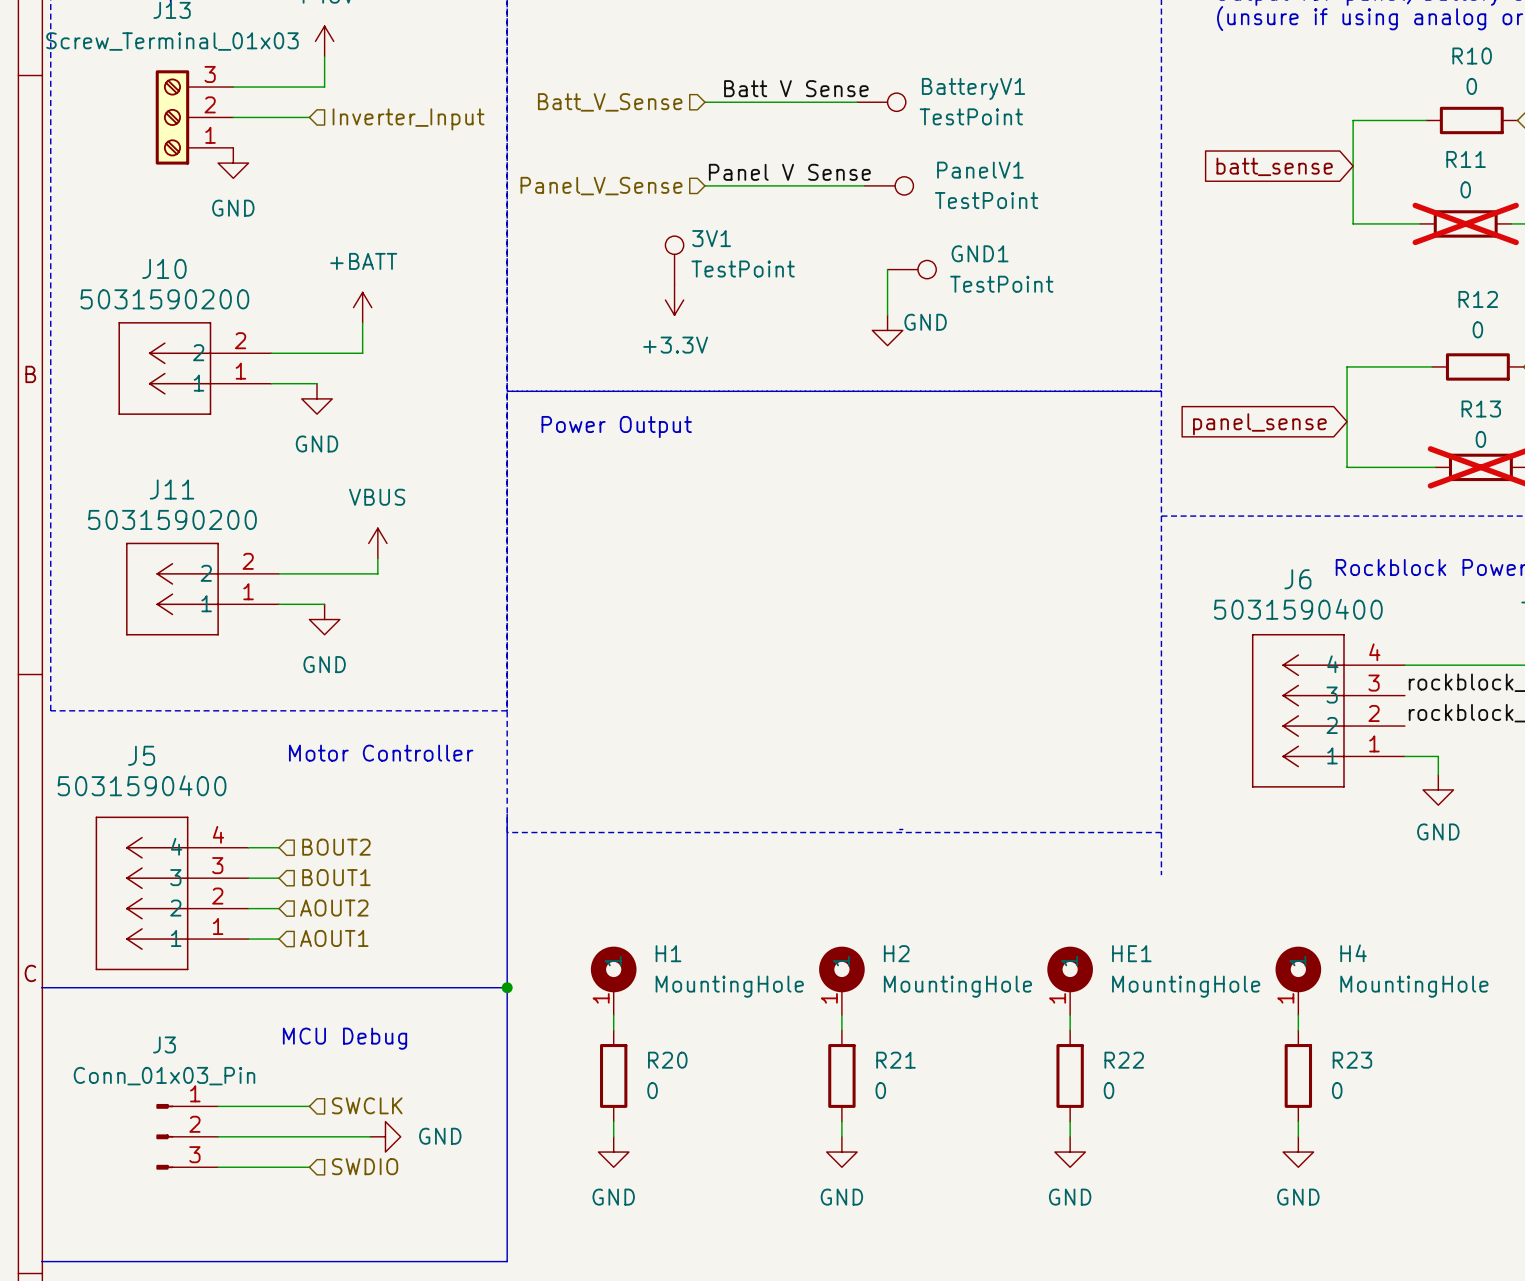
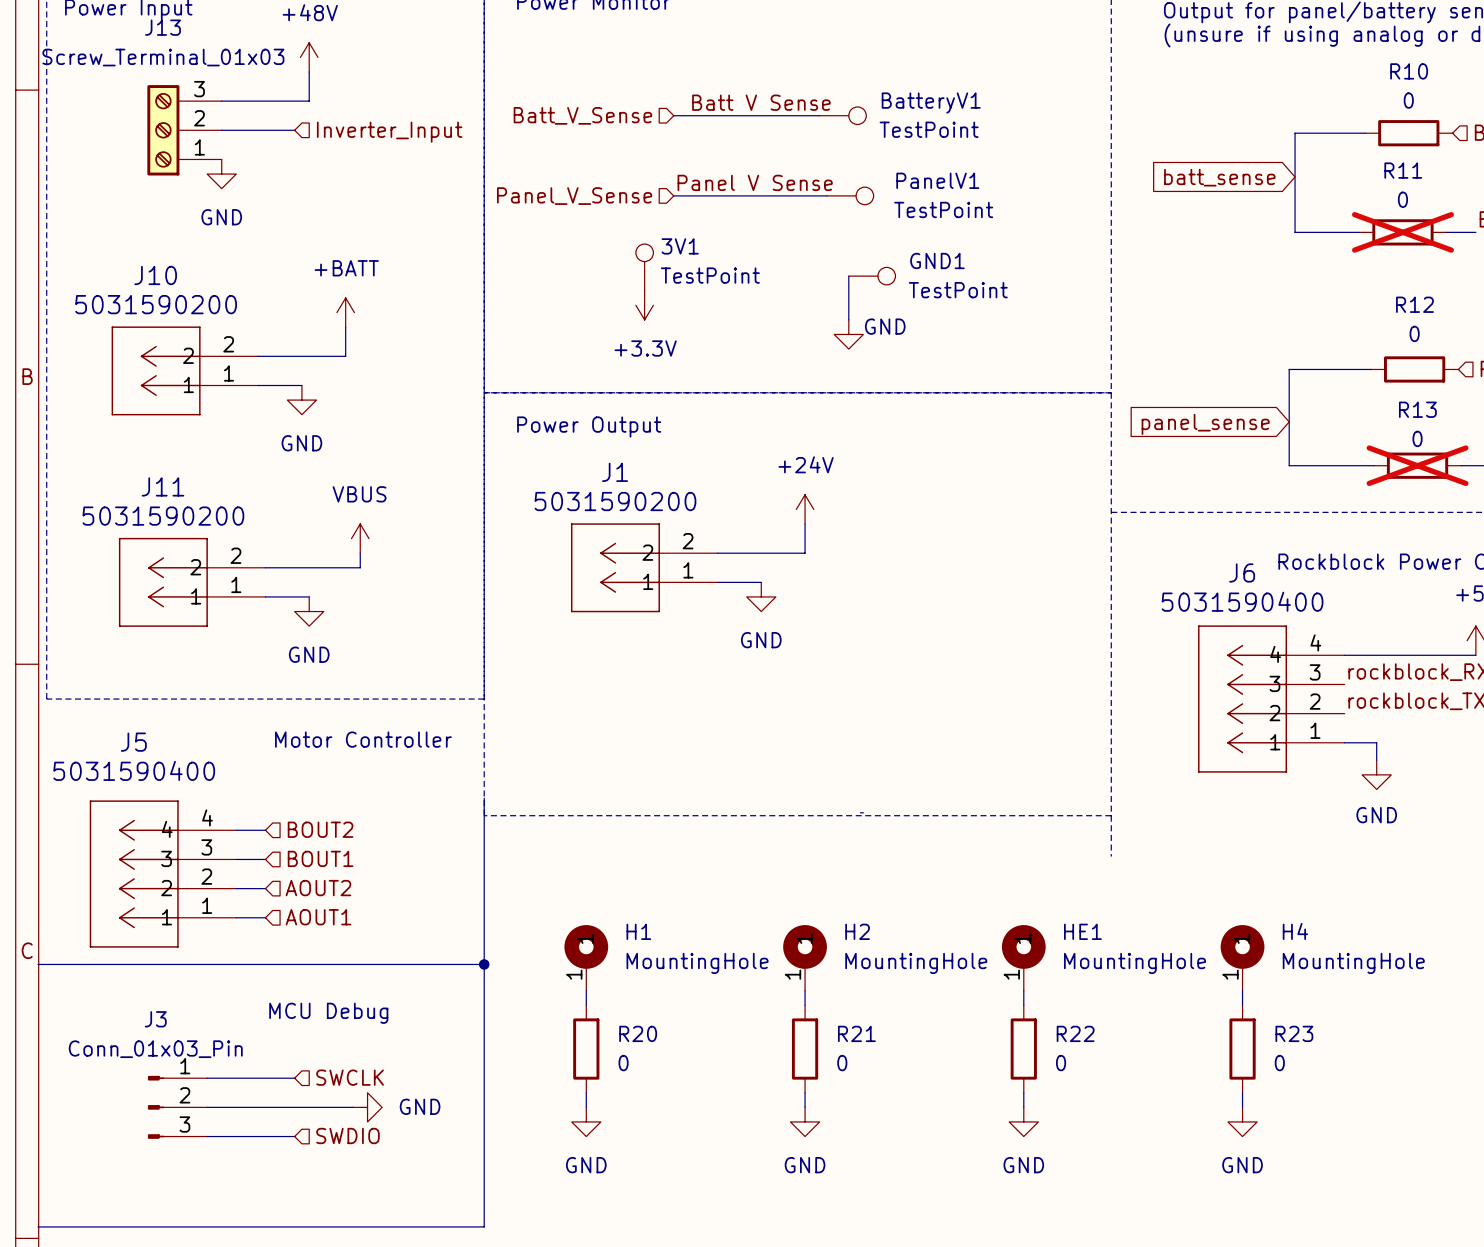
power symbol: none -> +24V (805, 509)
wire: none -> (805, 524) (805, 553) (717, 553)
J1: none -> 5031590200 (644, 567)
wire: none -> (717, 582) (761, 582)
power symbol: none -> GND (761, 596)

